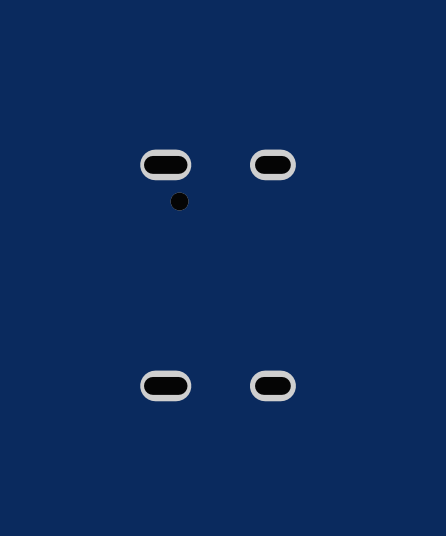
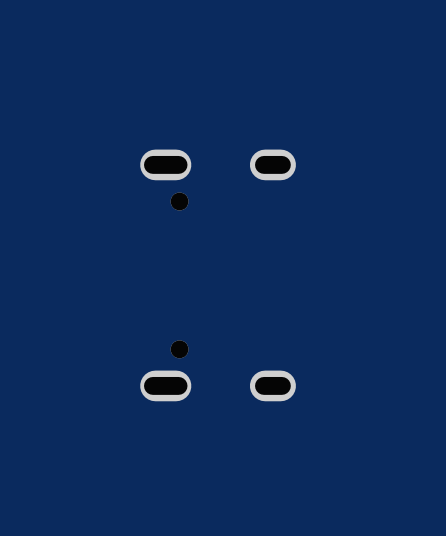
part: none -> (179, 349)

